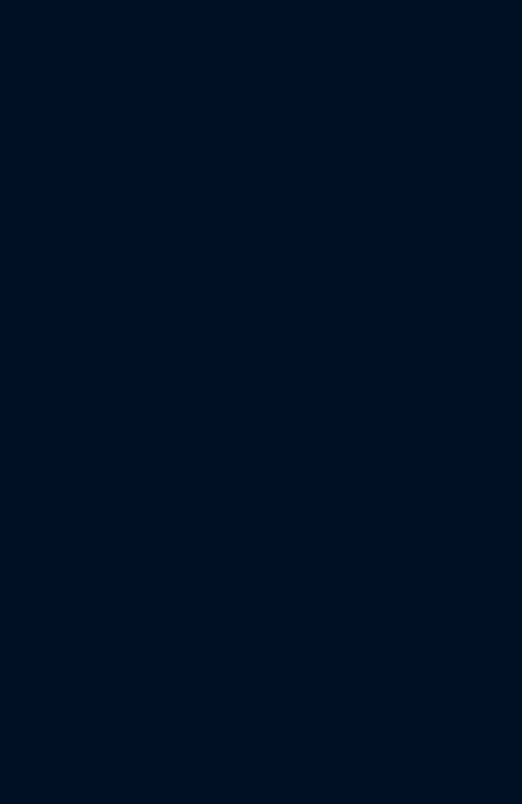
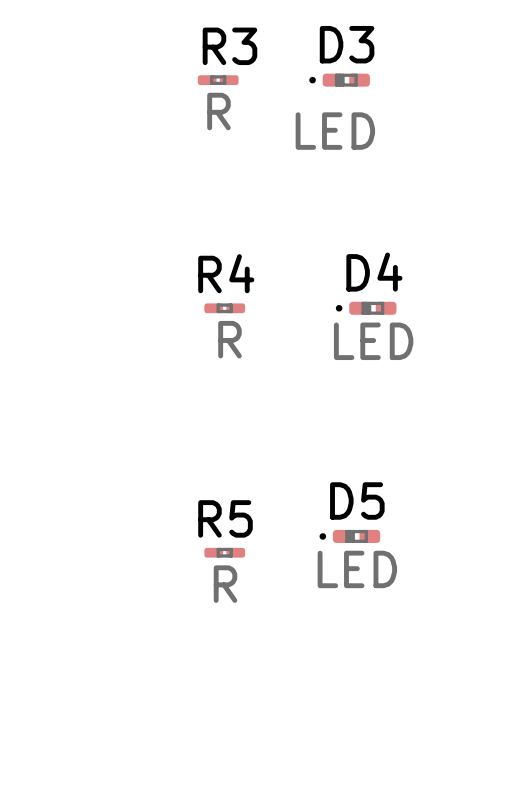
R3: none -> R (218, 80)
D3: none -> LED (339, 80)
R4: none -> R (224, 308)
D4: none -> LED (366, 308)
D5: none -> LED (349, 536)
R5: none -> R (224, 552)

